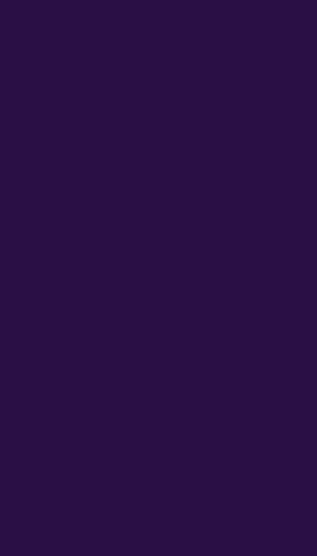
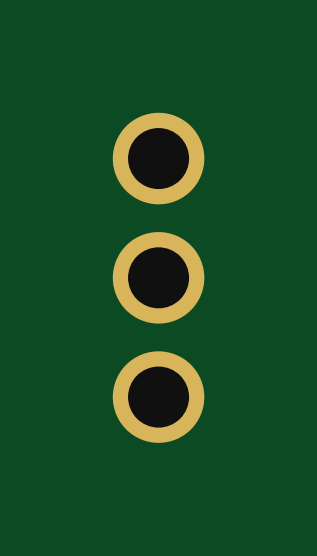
part: none -> (158, 277)

